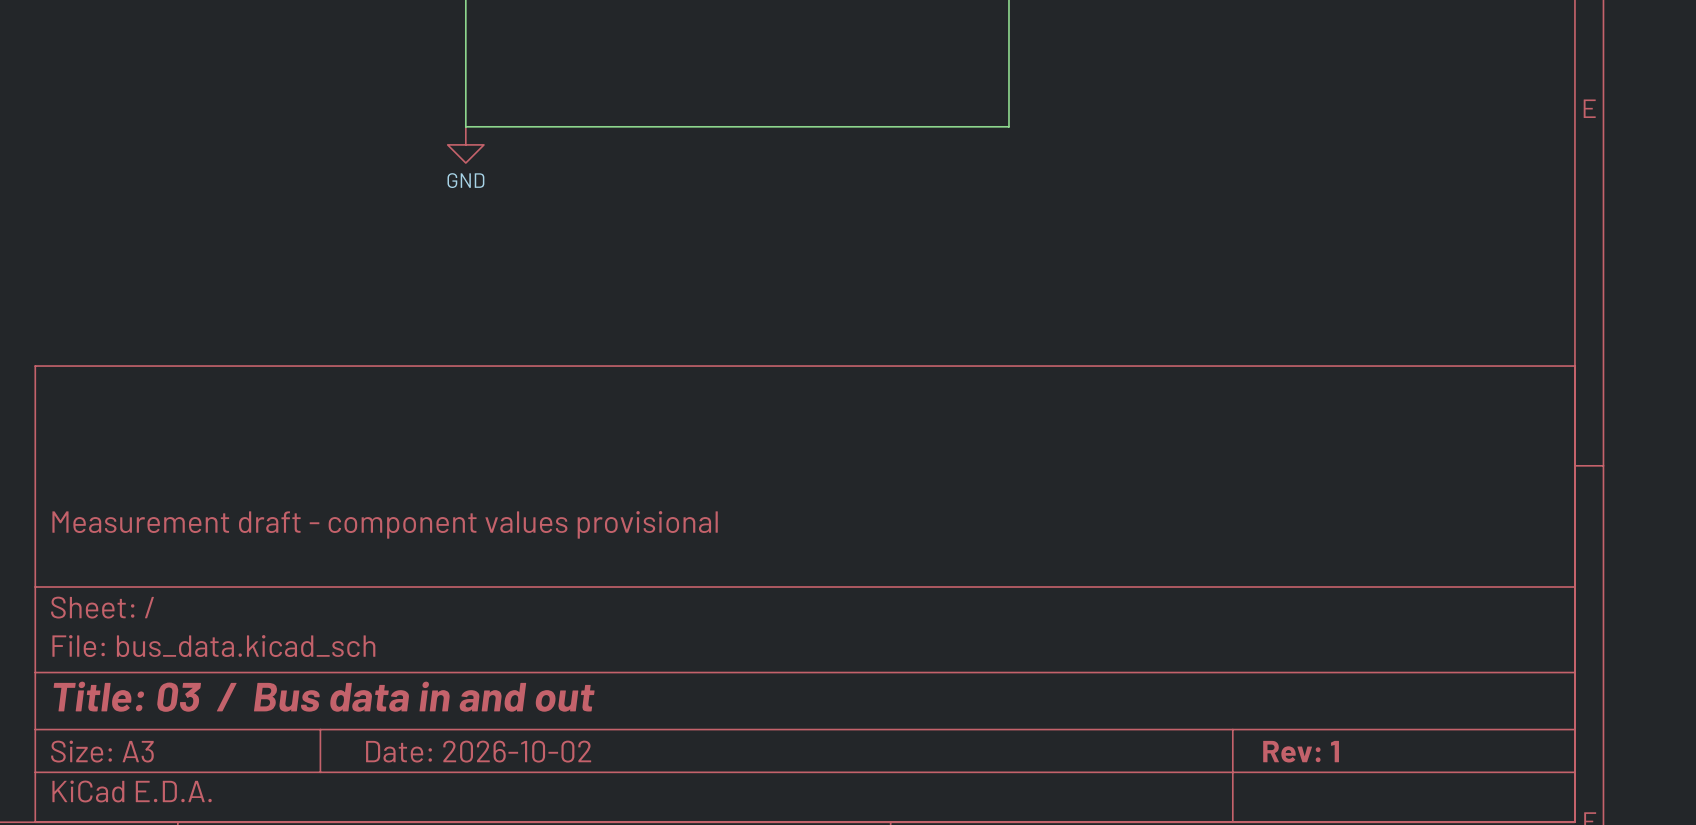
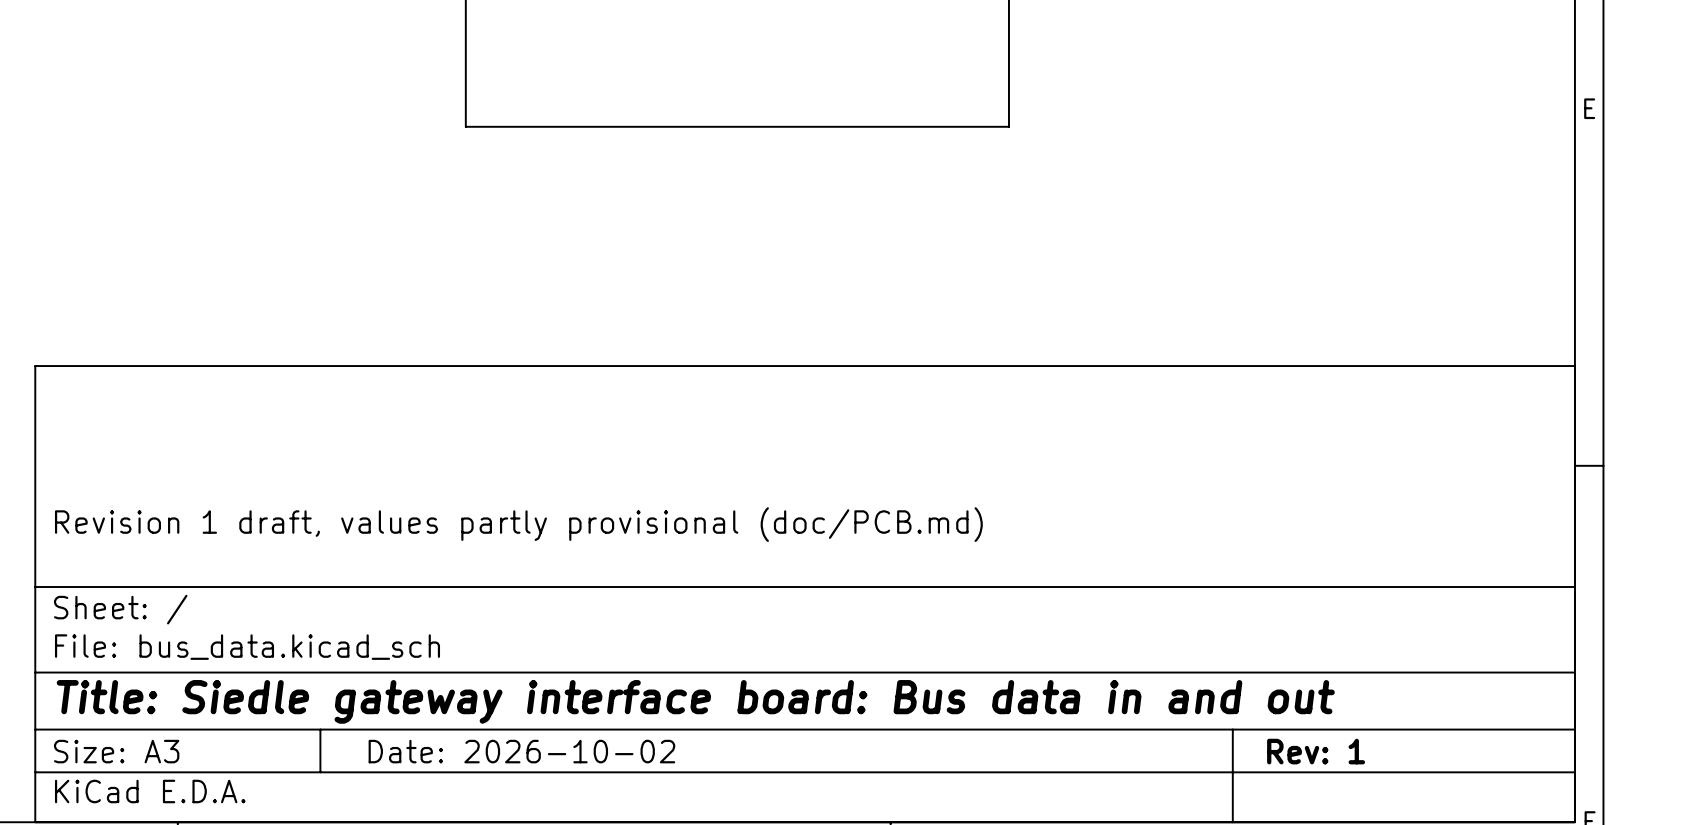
power symbol: GND (465, 144) -> none
title block: Measurement draft - component values provisional (385, 524) -> Revision 1 draft, values partly provisional (doc/PCB.md) (518, 524)
title block: Title: 03 / Bus data in and out (324, 696) -> Title: Siedle gateway interface board: Bus data in and out (695, 701)

